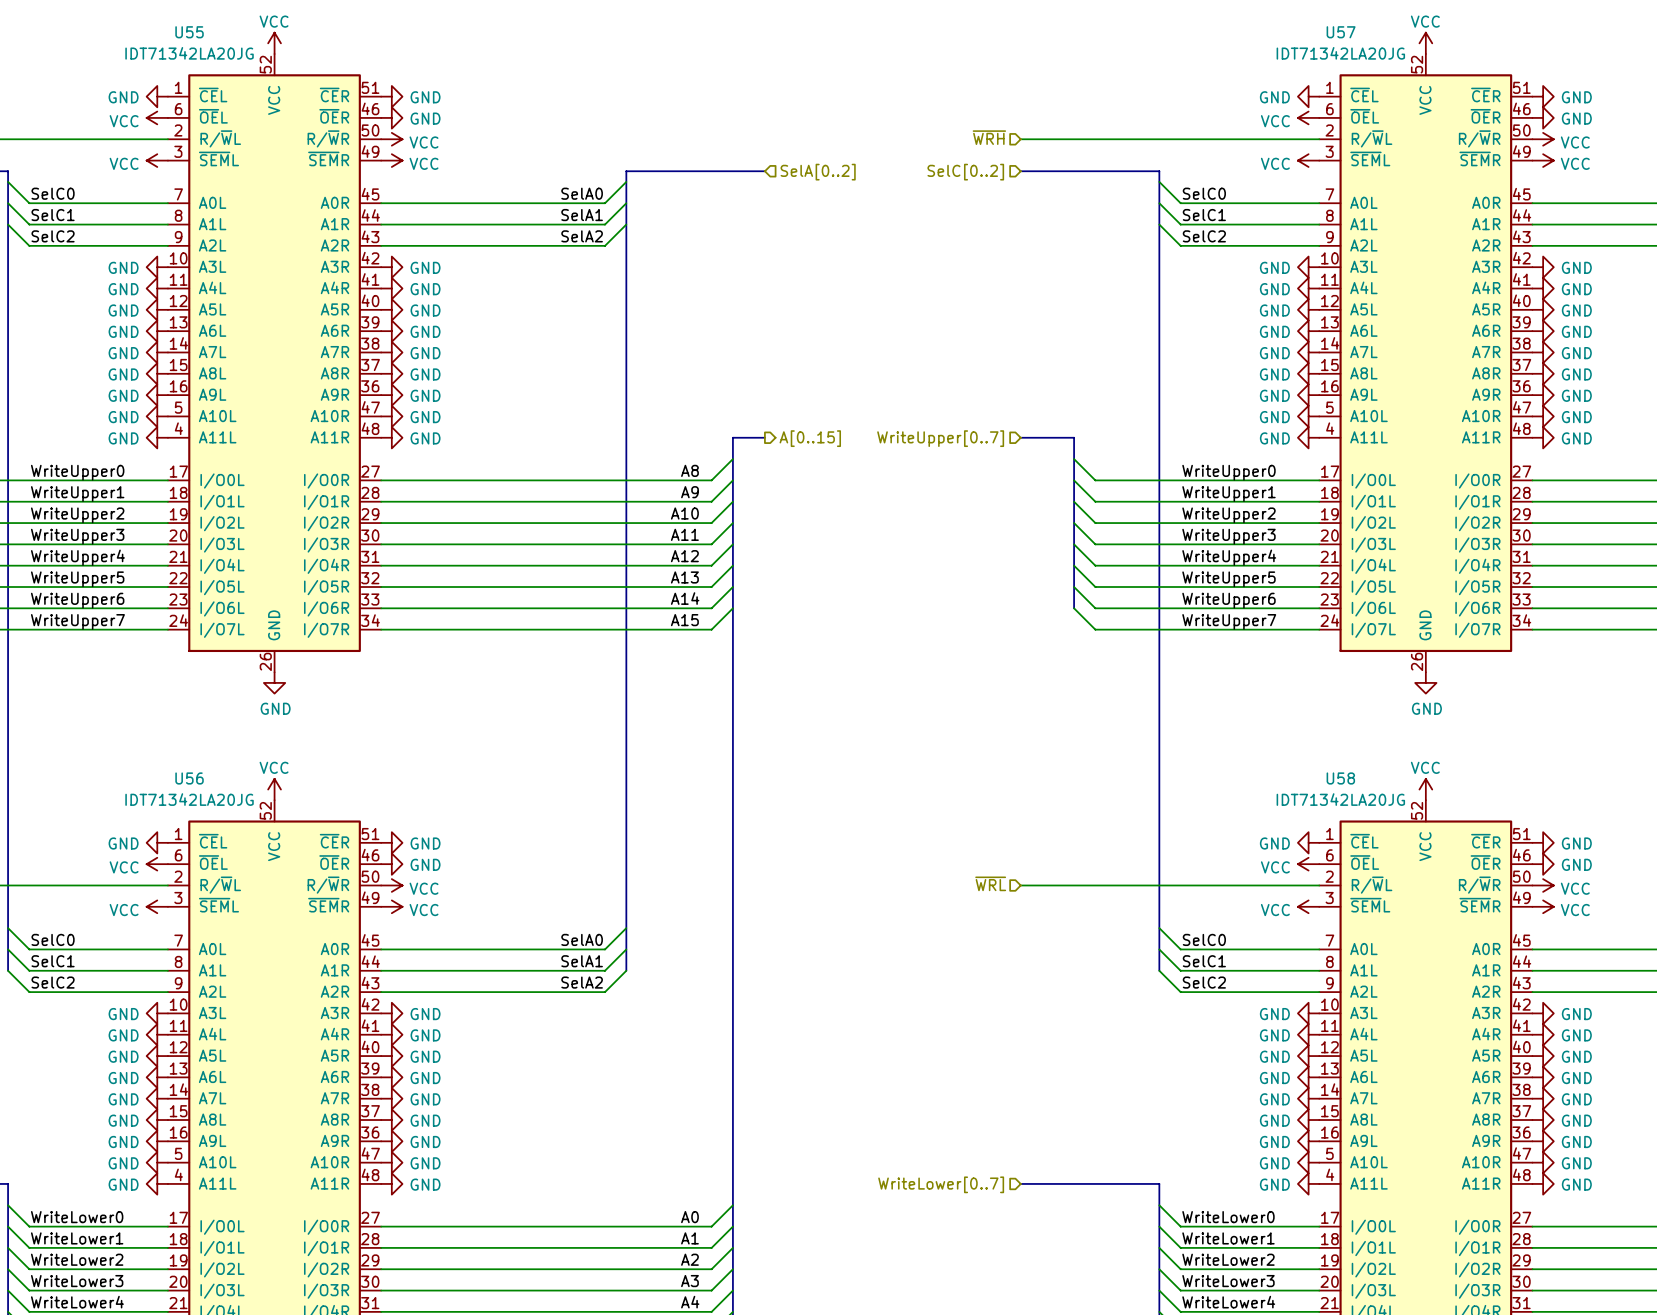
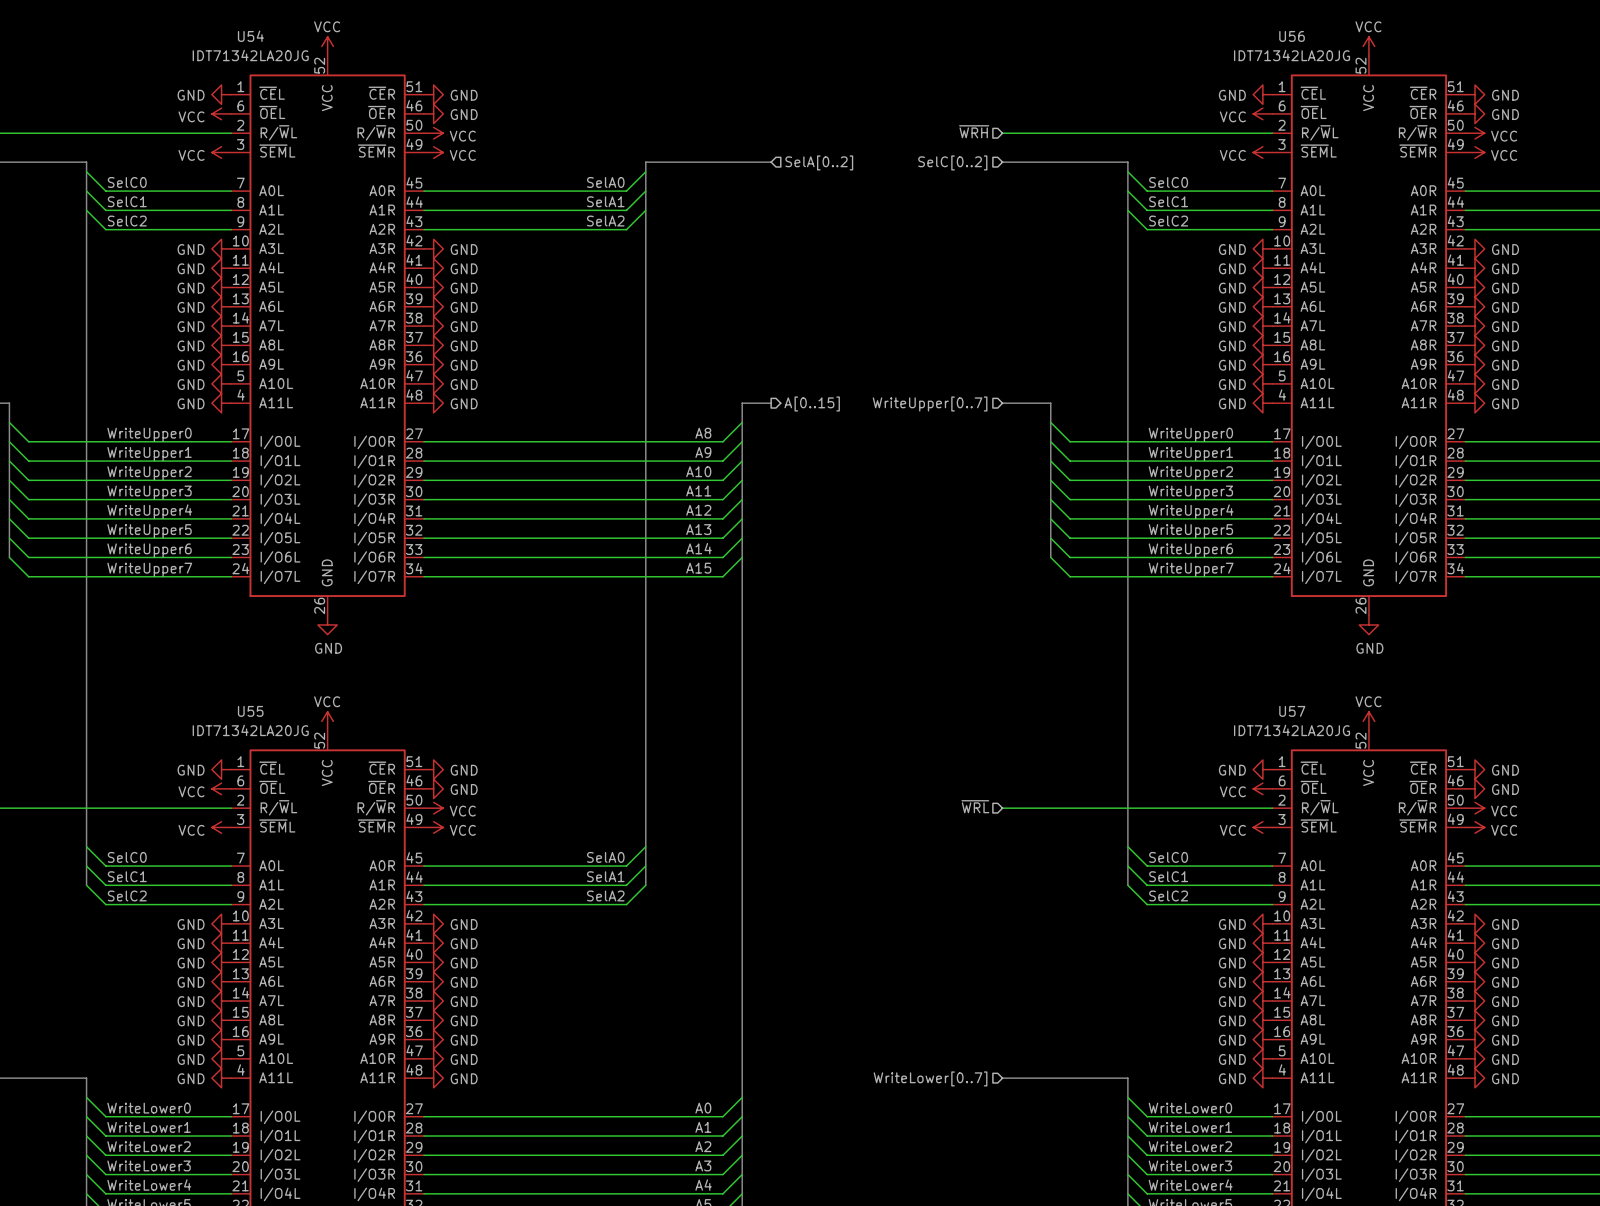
U55 name: U55 (189, 32) -> U54 (250, 36)
U57 name: U57 (1341, 32) -> U56 (1292, 36)
U56 name: U56 (189, 778) -> U55 (250, 711)
U58 name: U58 (1340, 778) -> U57 (1292, 711)

